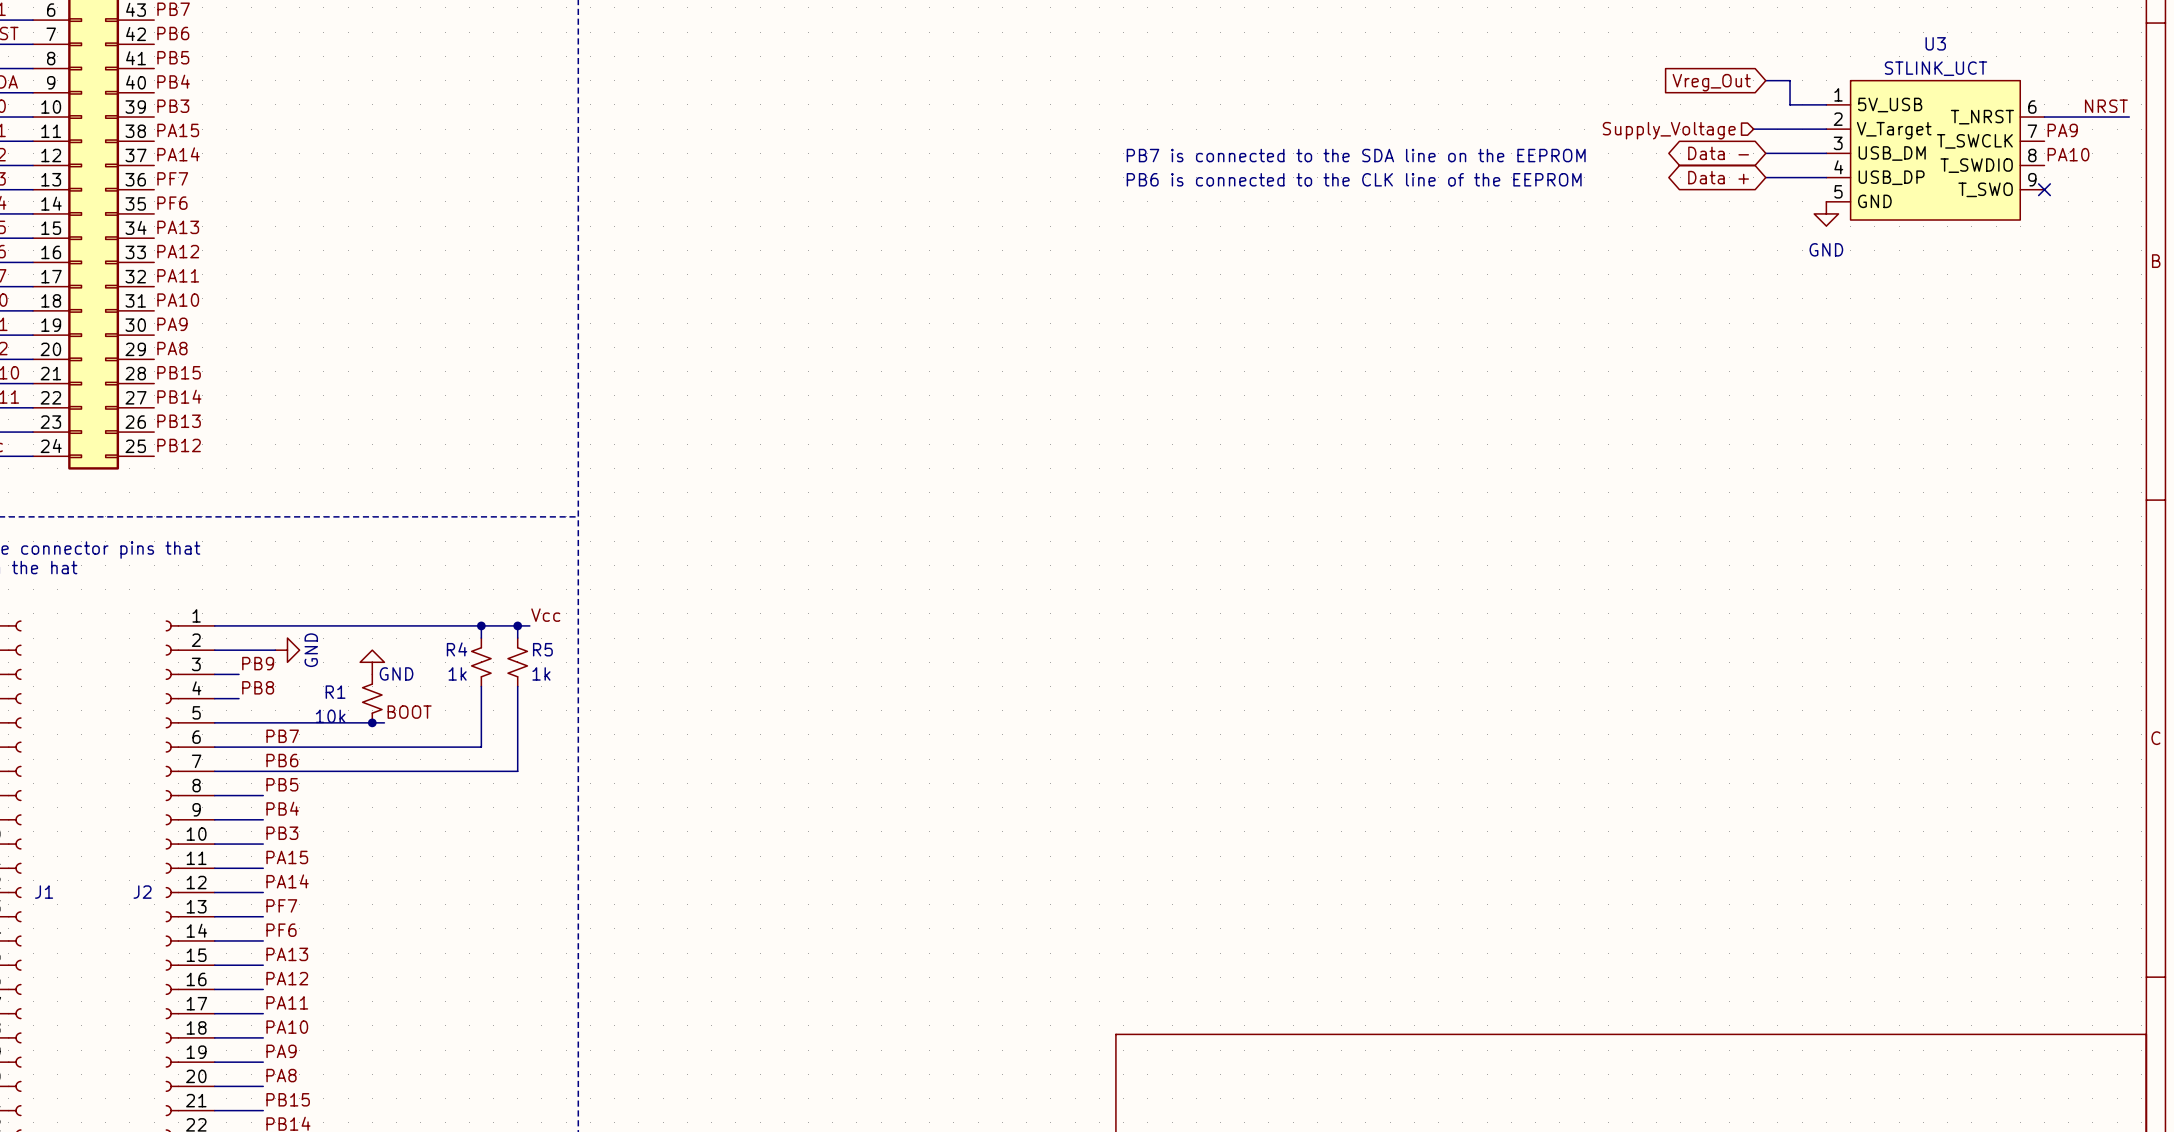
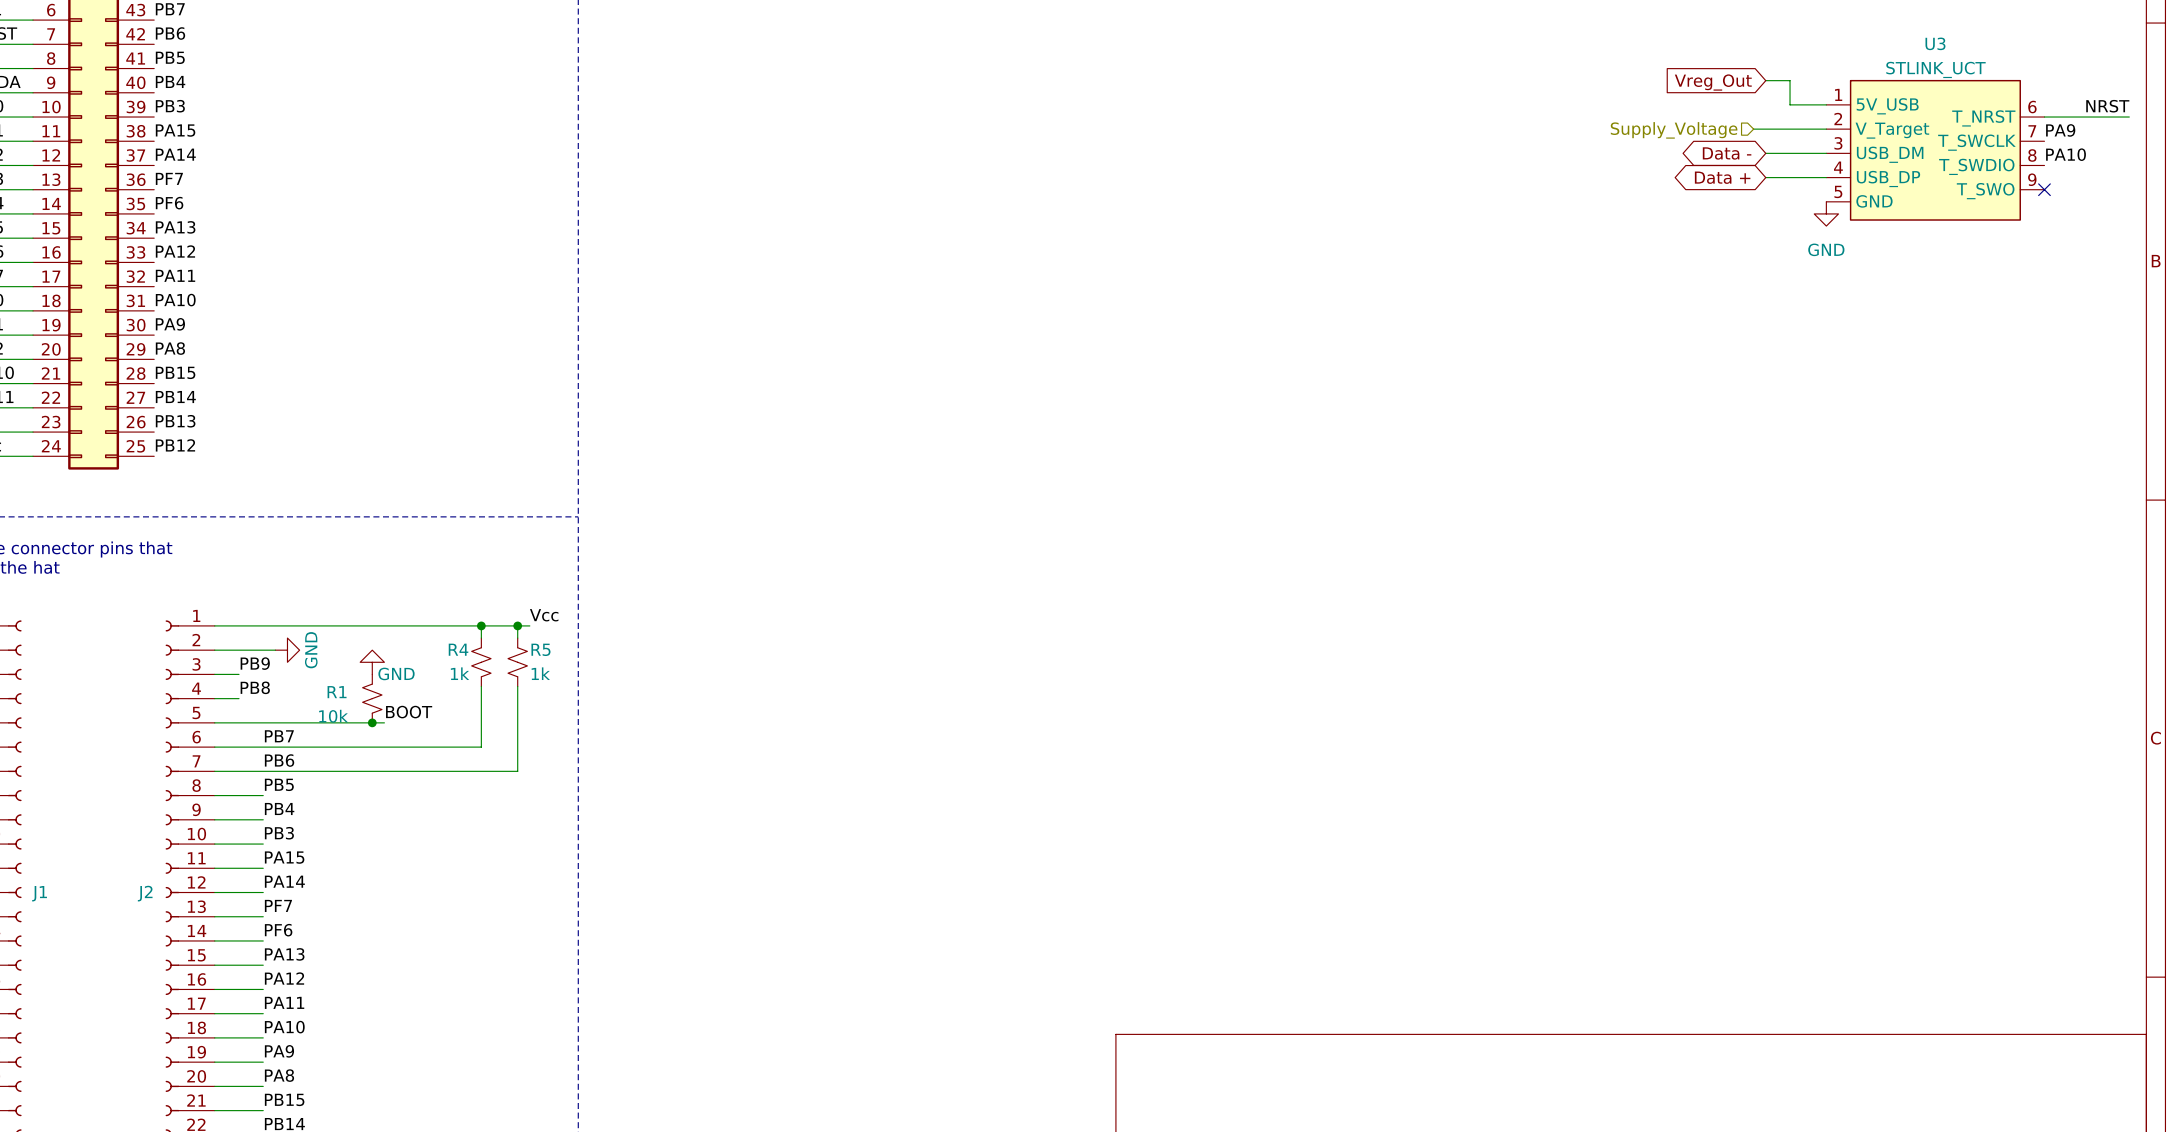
text: PB7 is connected to the SDA line on the EEPROM (1356, 155) -> none
text: PB6 is connected to the CLK line of the EEPROM (1354, 179) -> none

